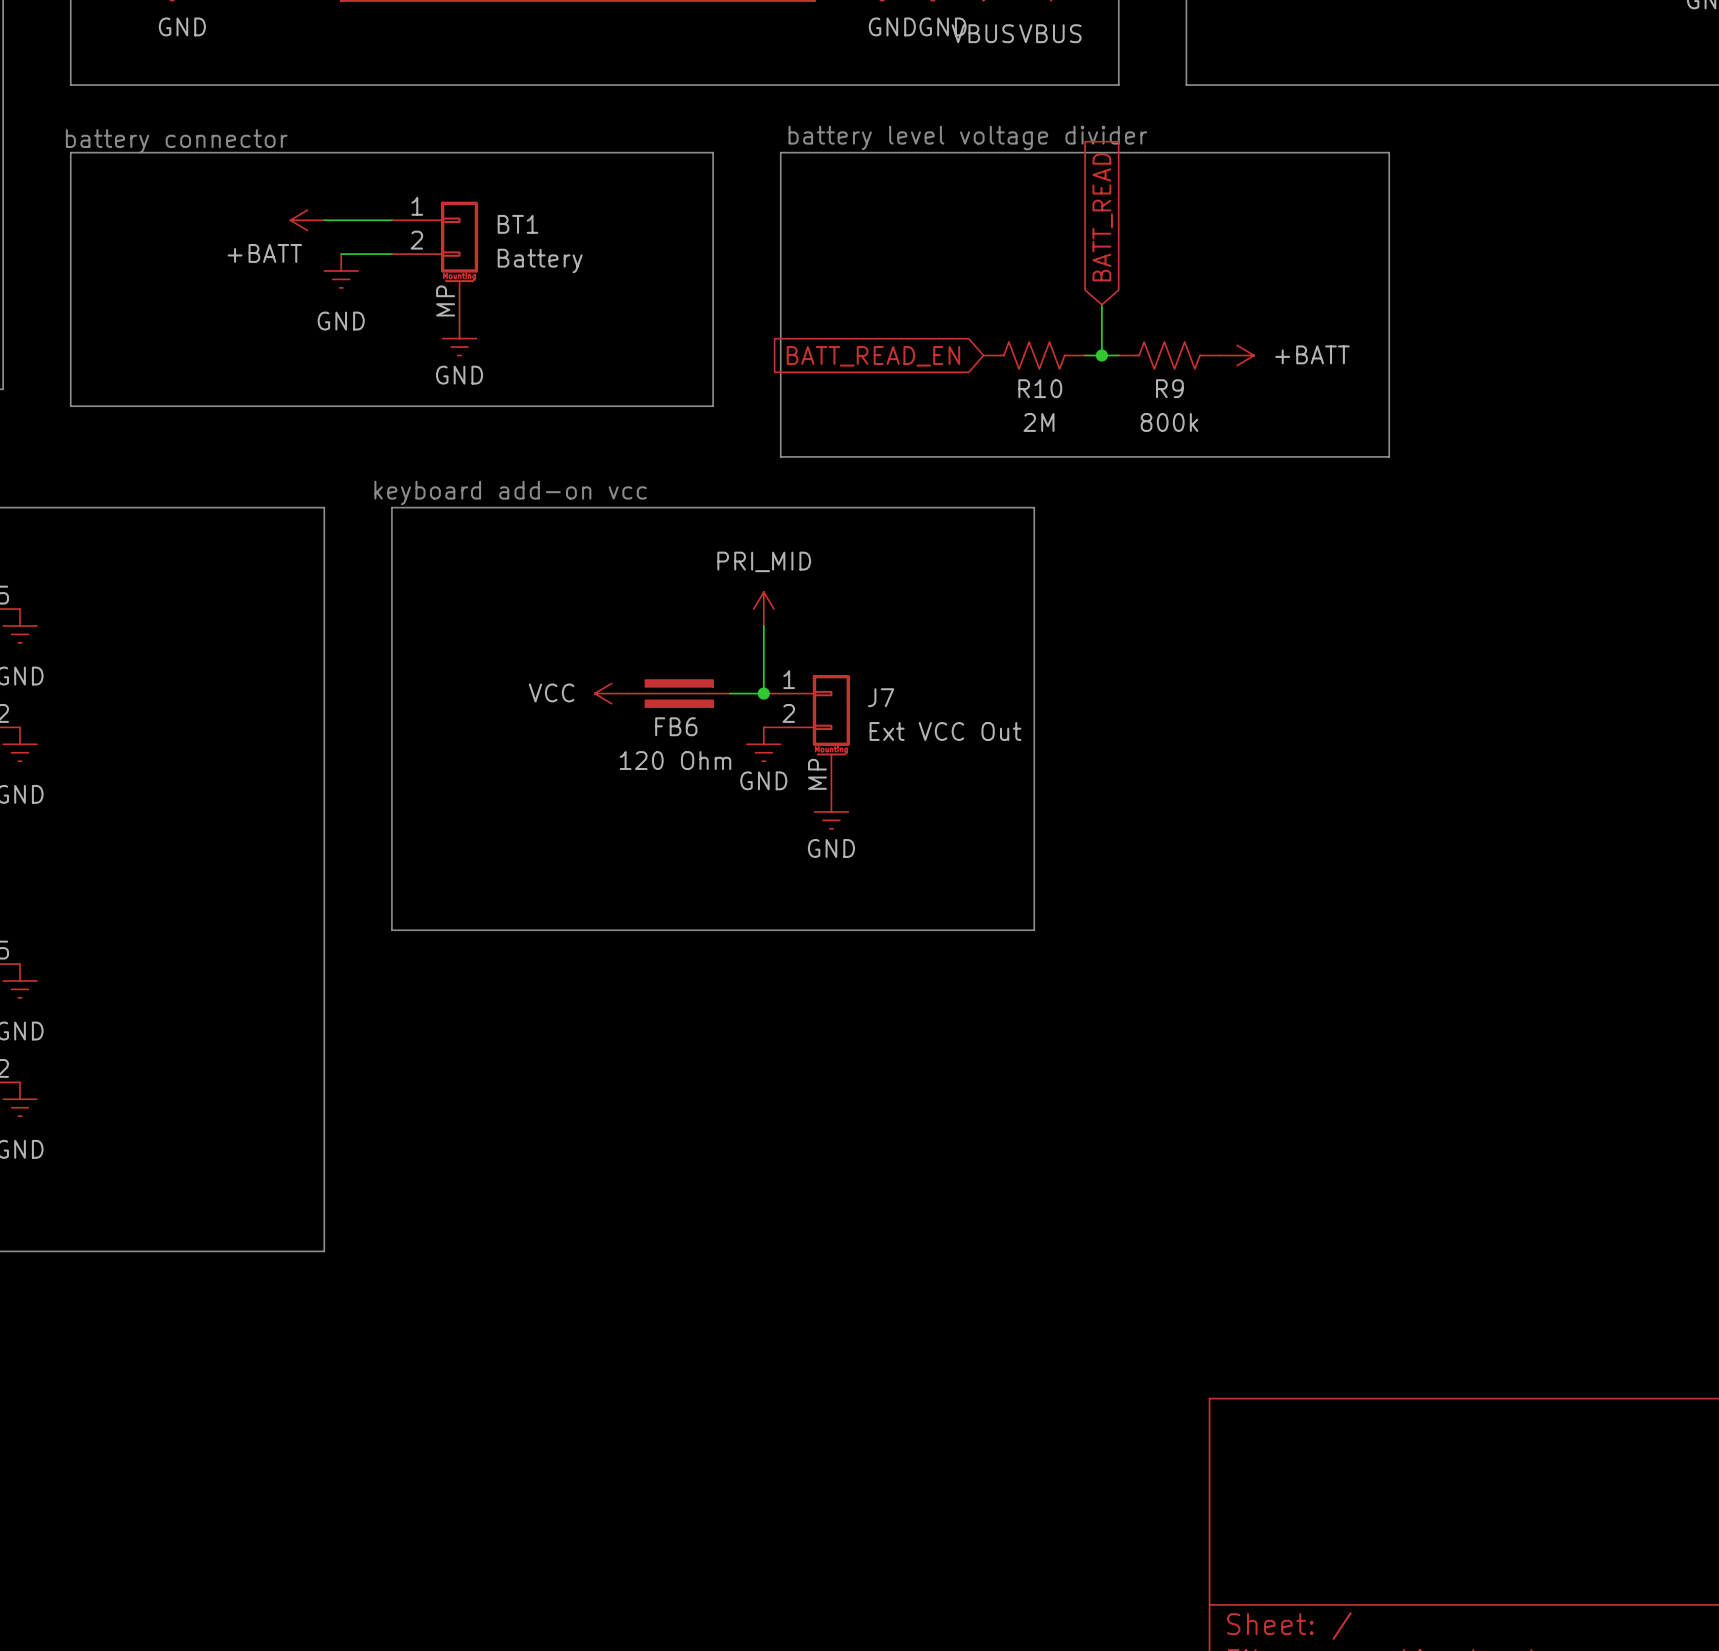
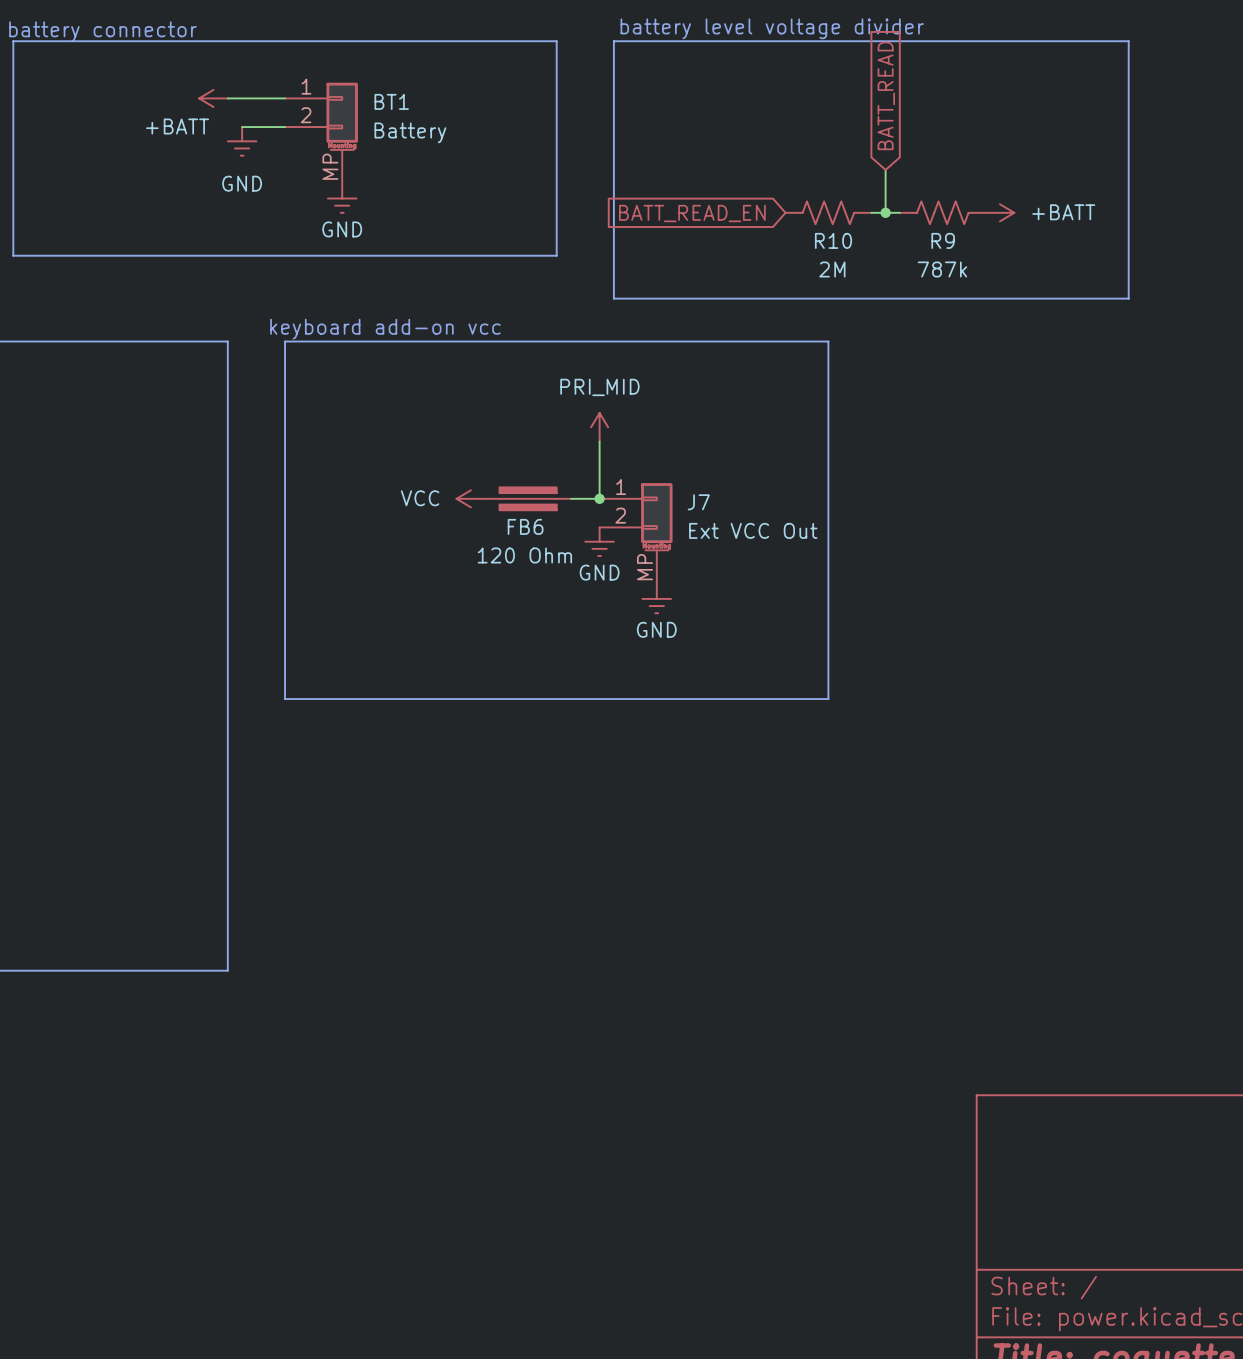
R9 value: 800k (1169, 422) -> 787k (942, 269)

